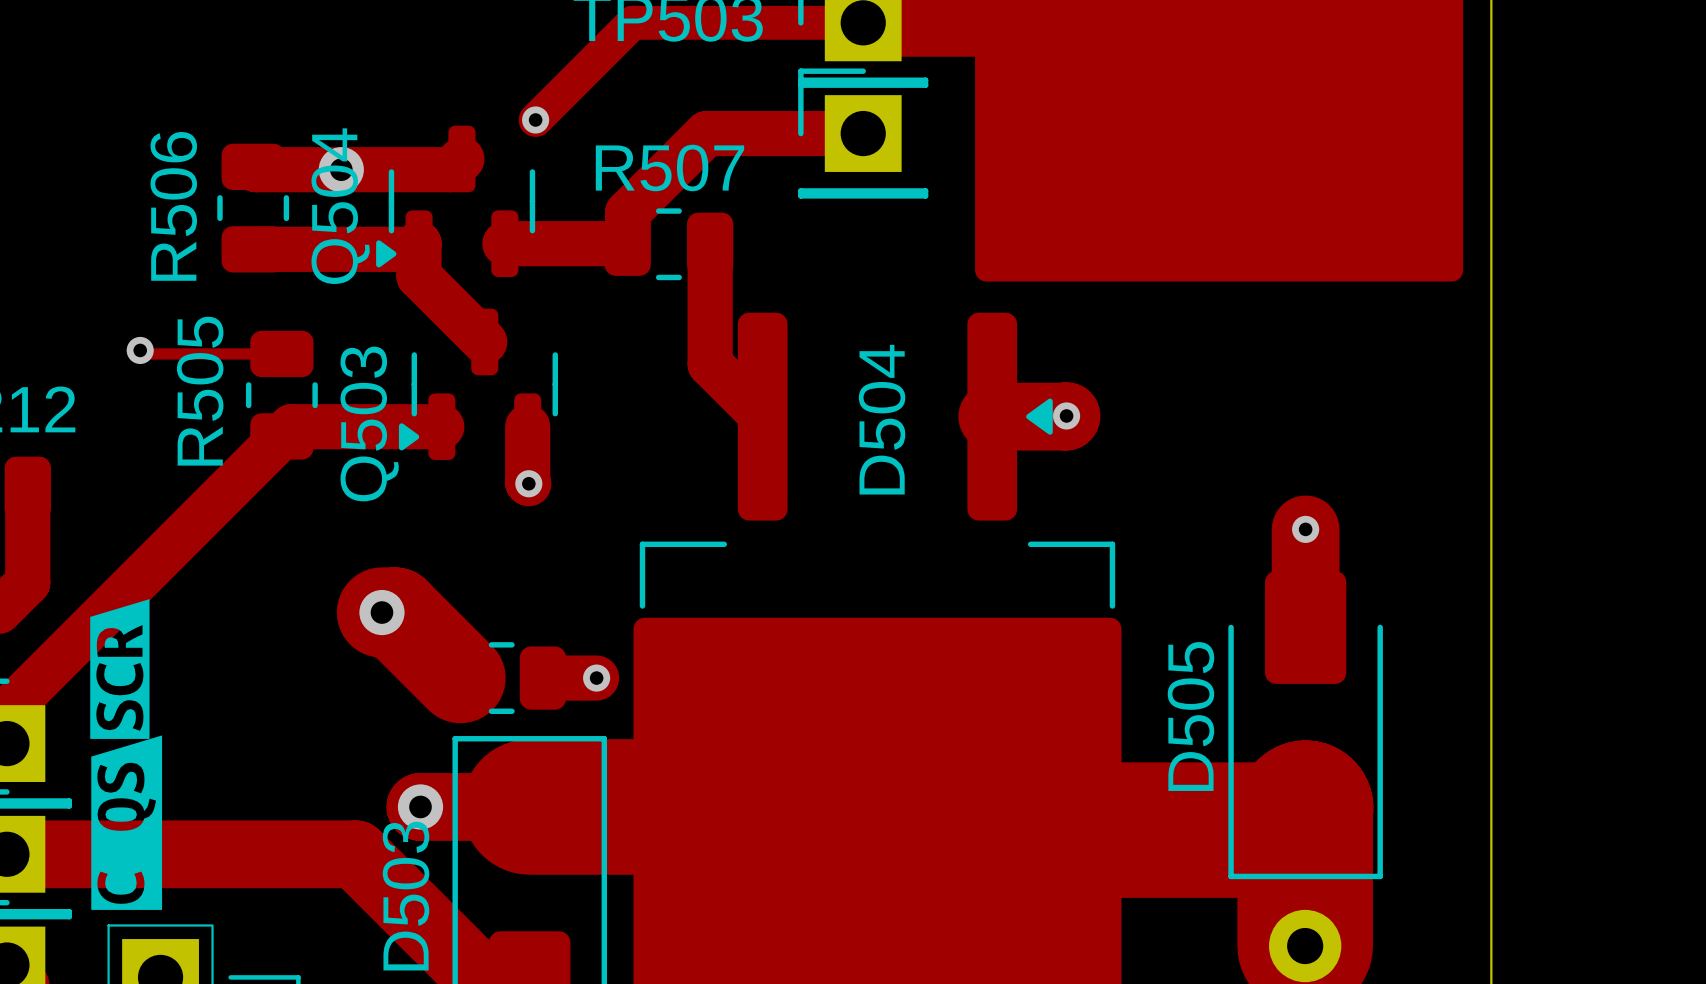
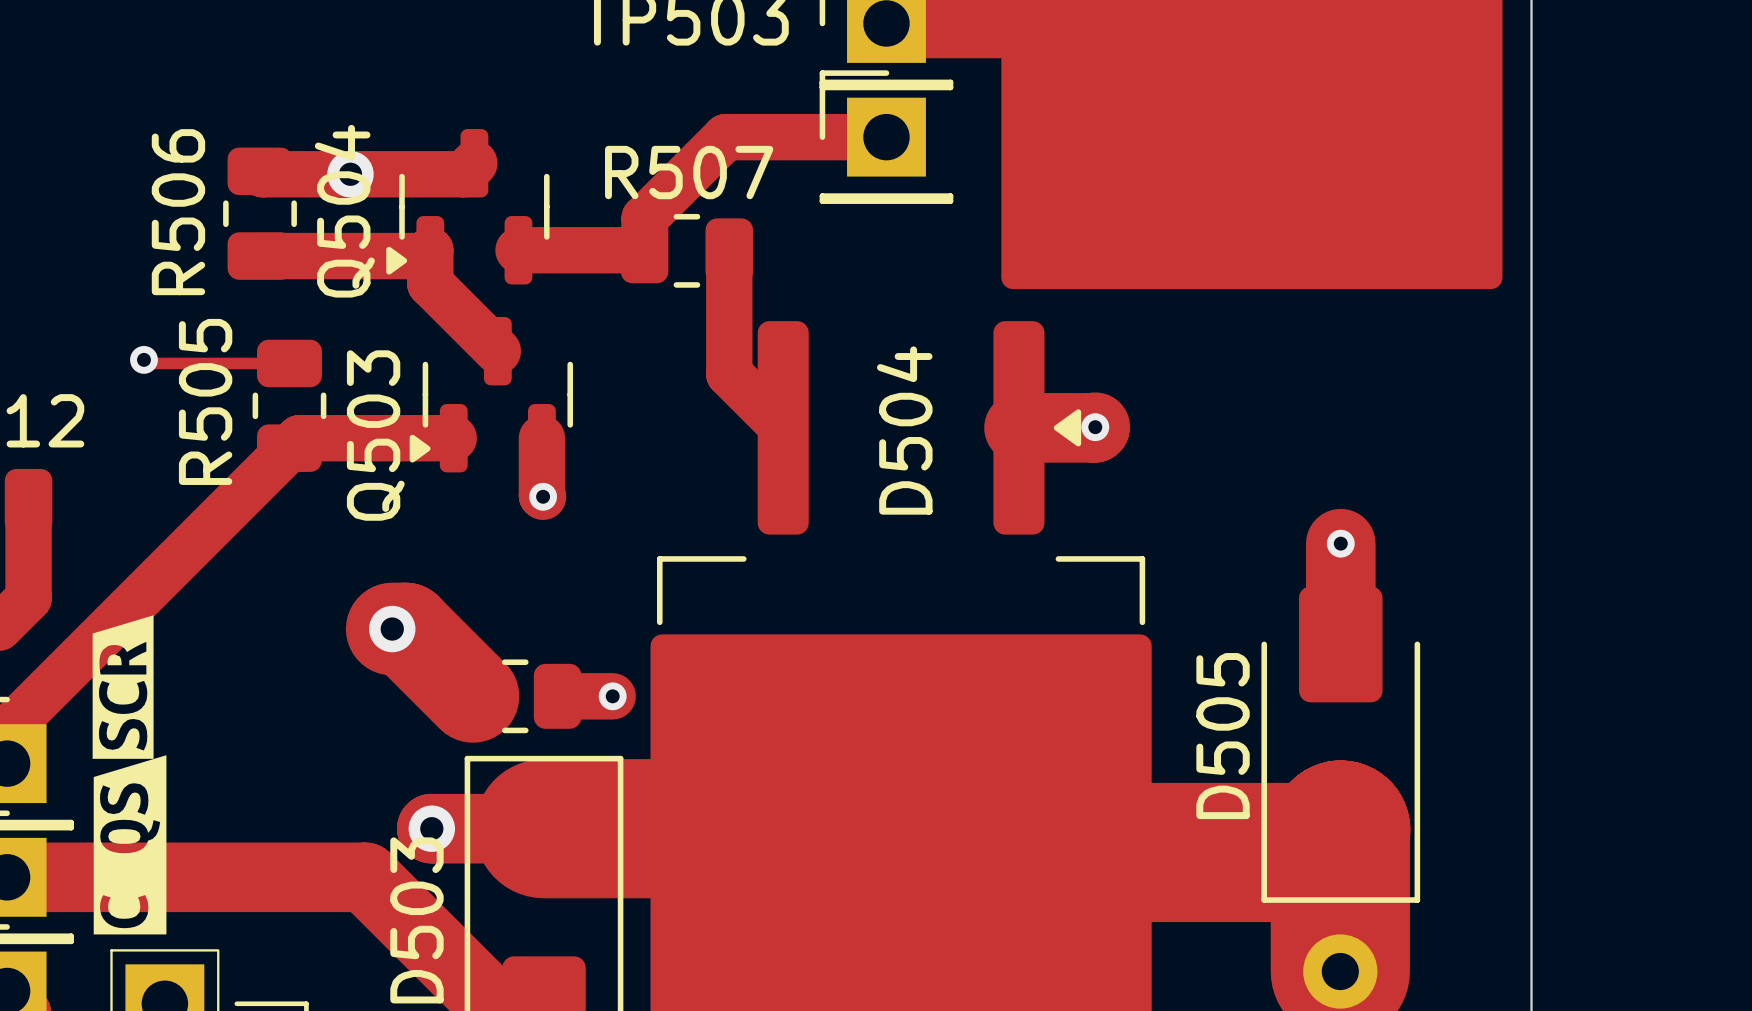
track: (863, 22) (632, 22) (535, 119) -> none
via: (535, 119) -> none

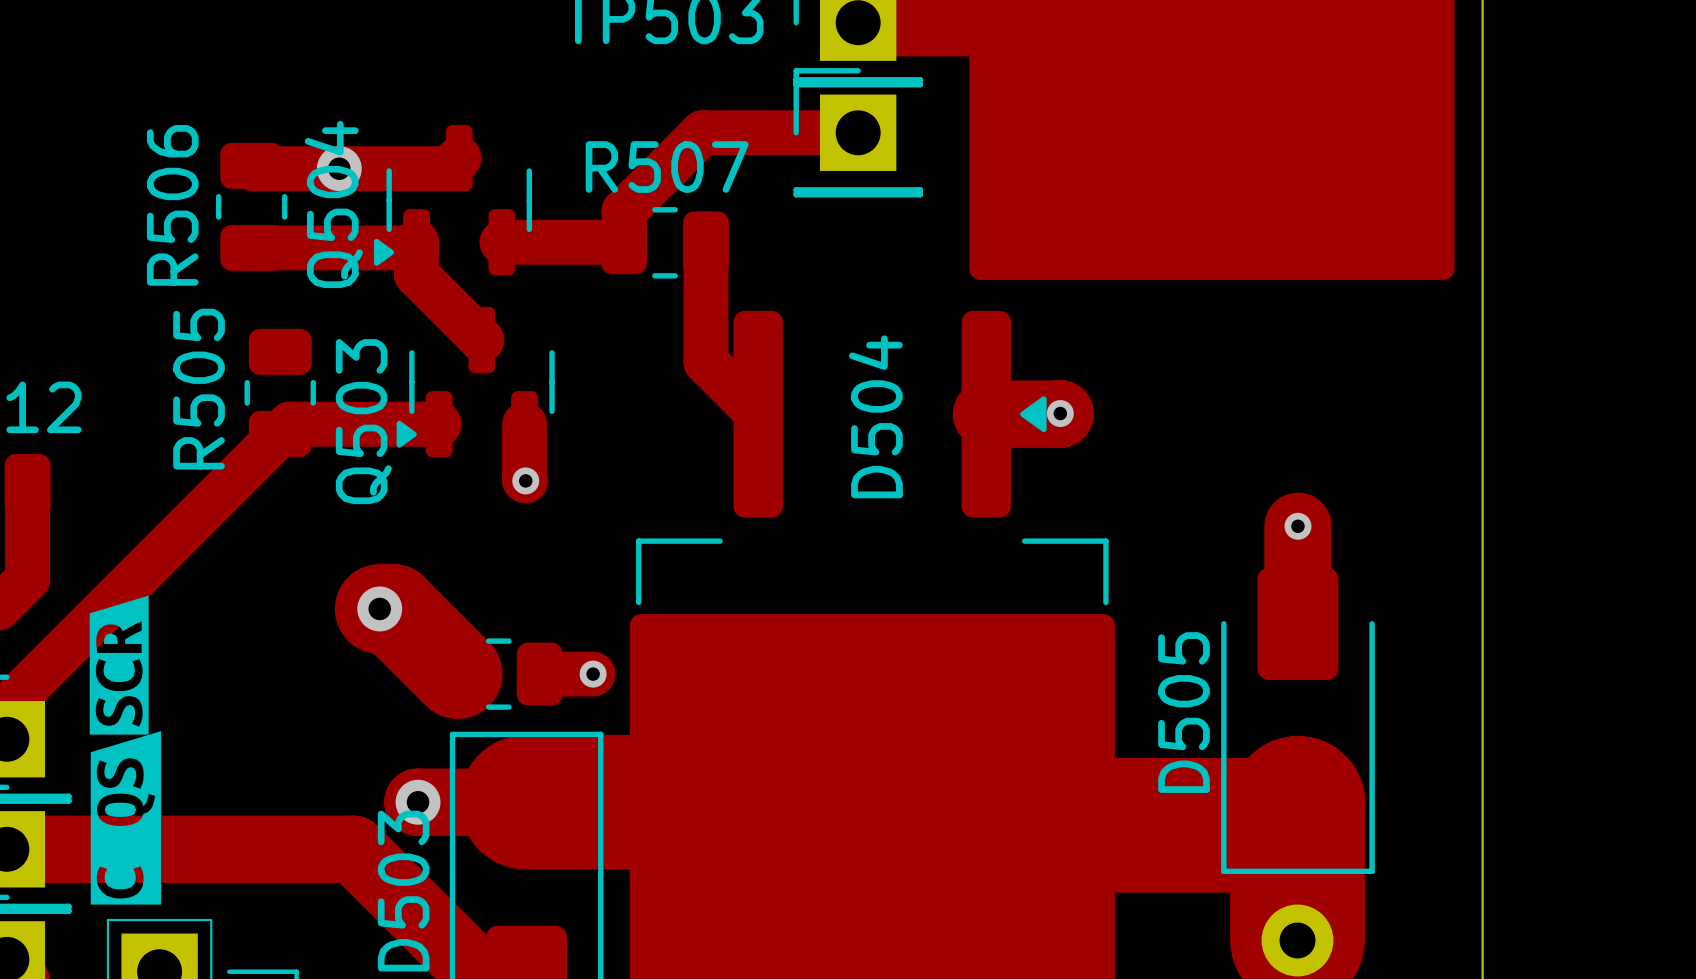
track: (143, 359) (147, 363) (289, 363) -> none
via: (143, 359) -> none

